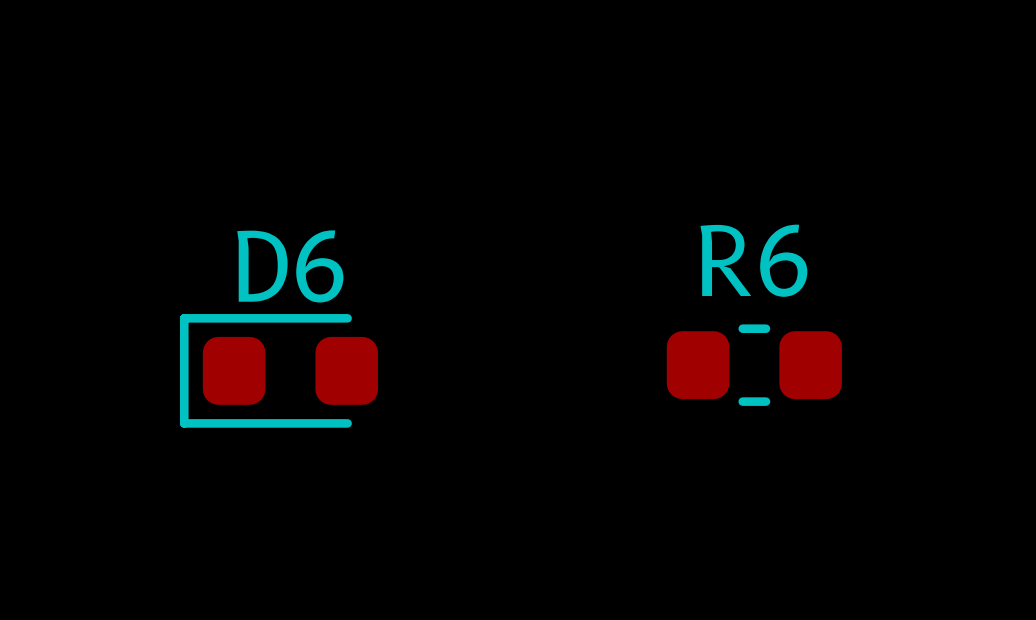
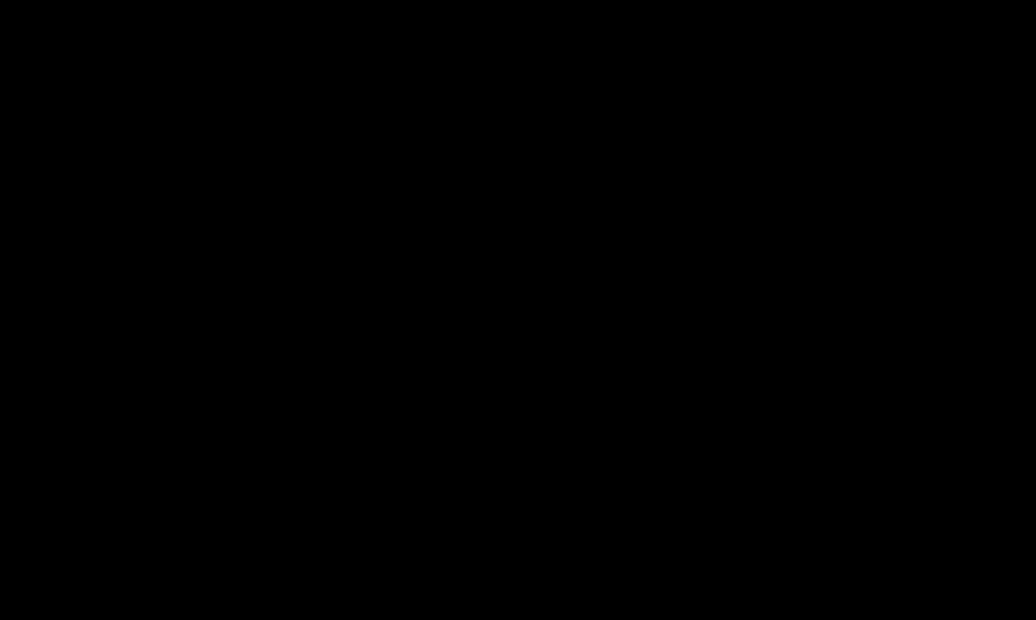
R6: (754, 365) -> none
D6: (278, 370) -> none

